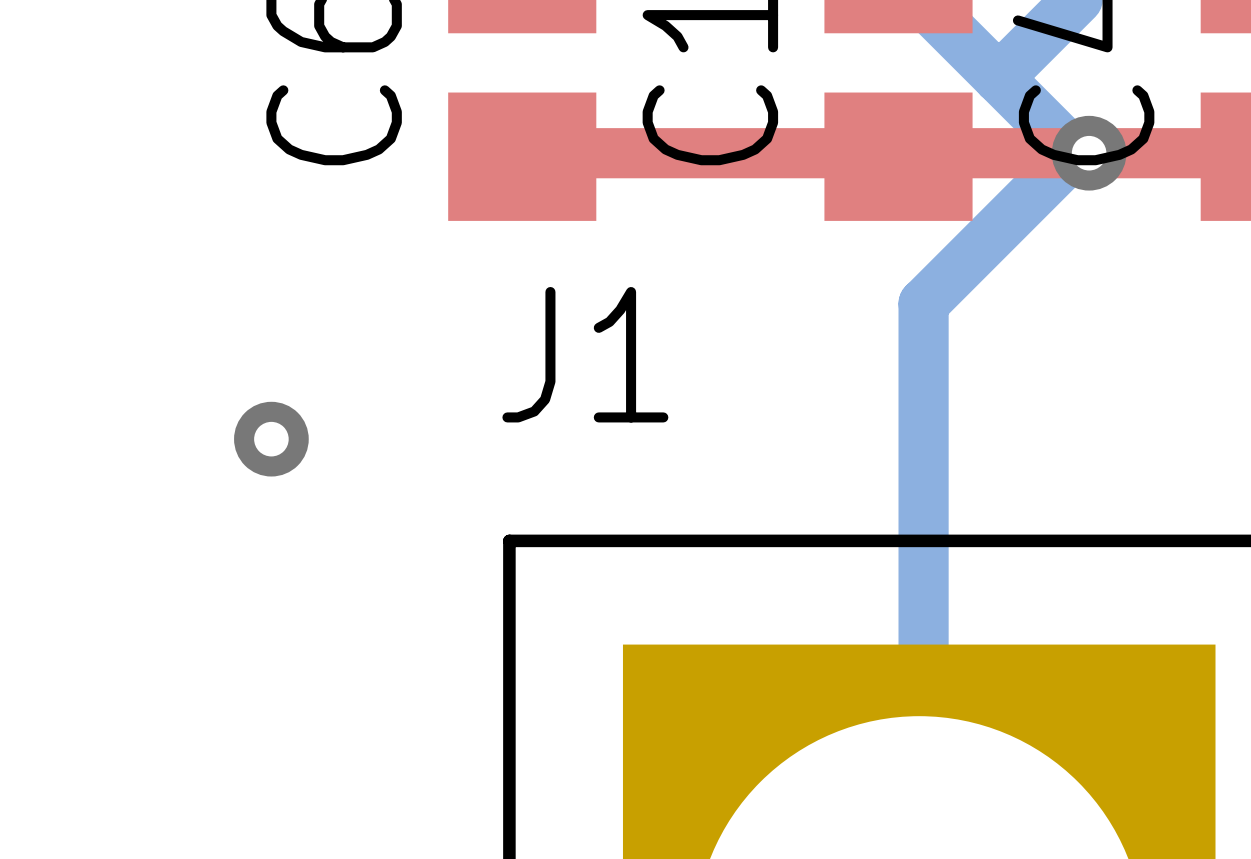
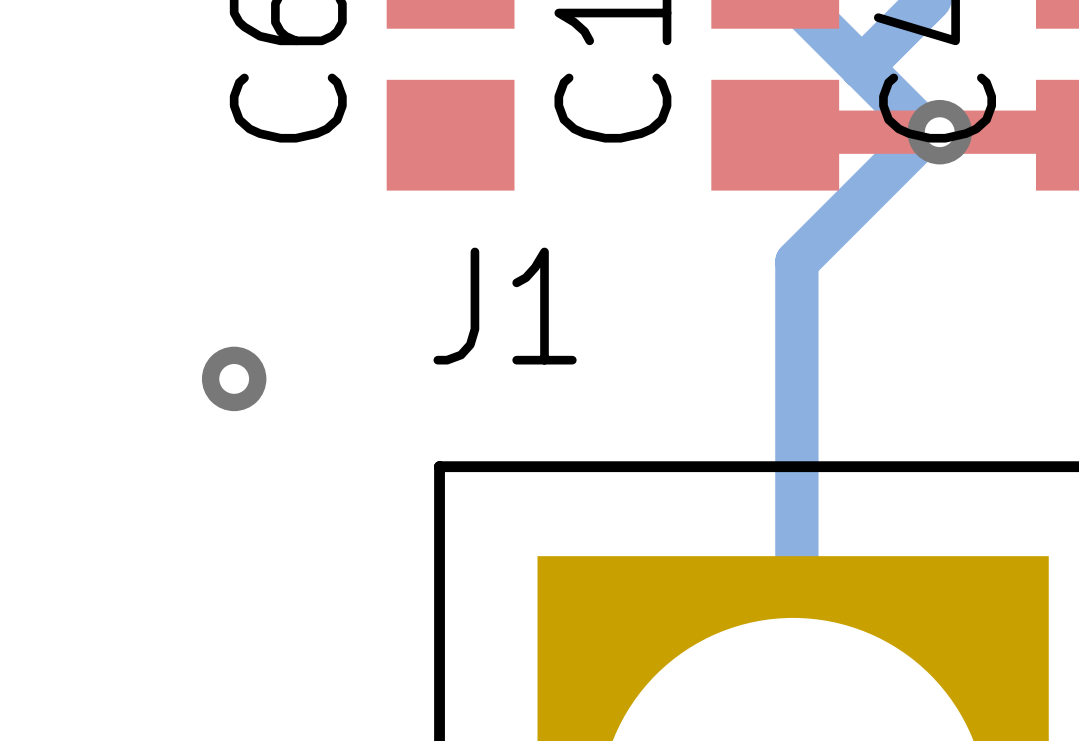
top track: (517, 153) (522, 156) (532, 153) (893, 153) -> none

